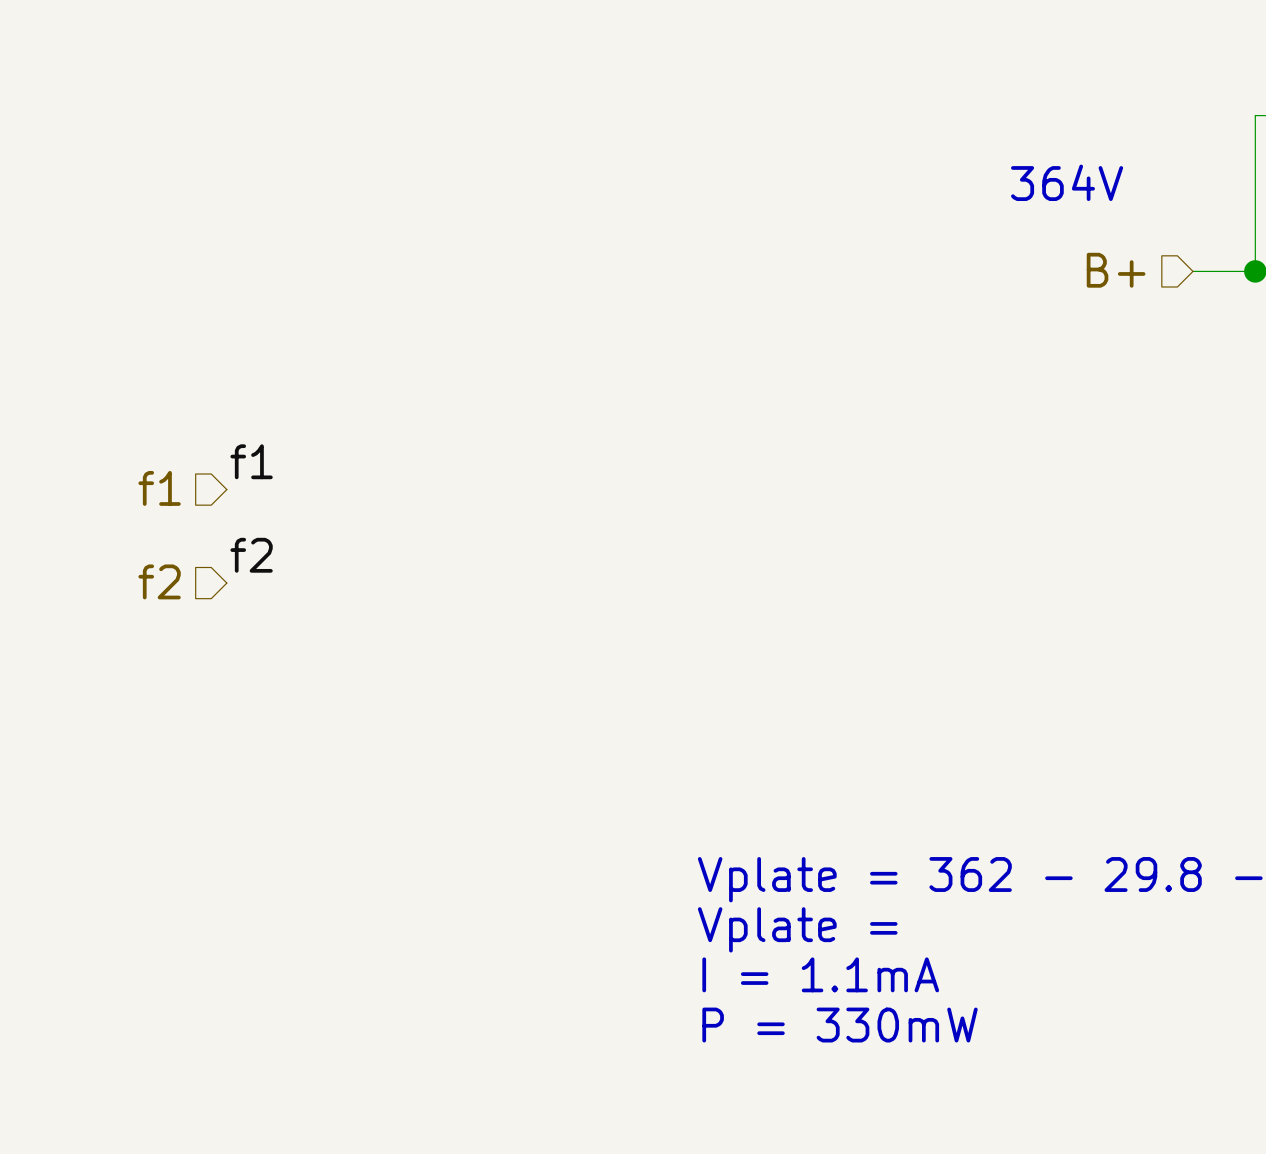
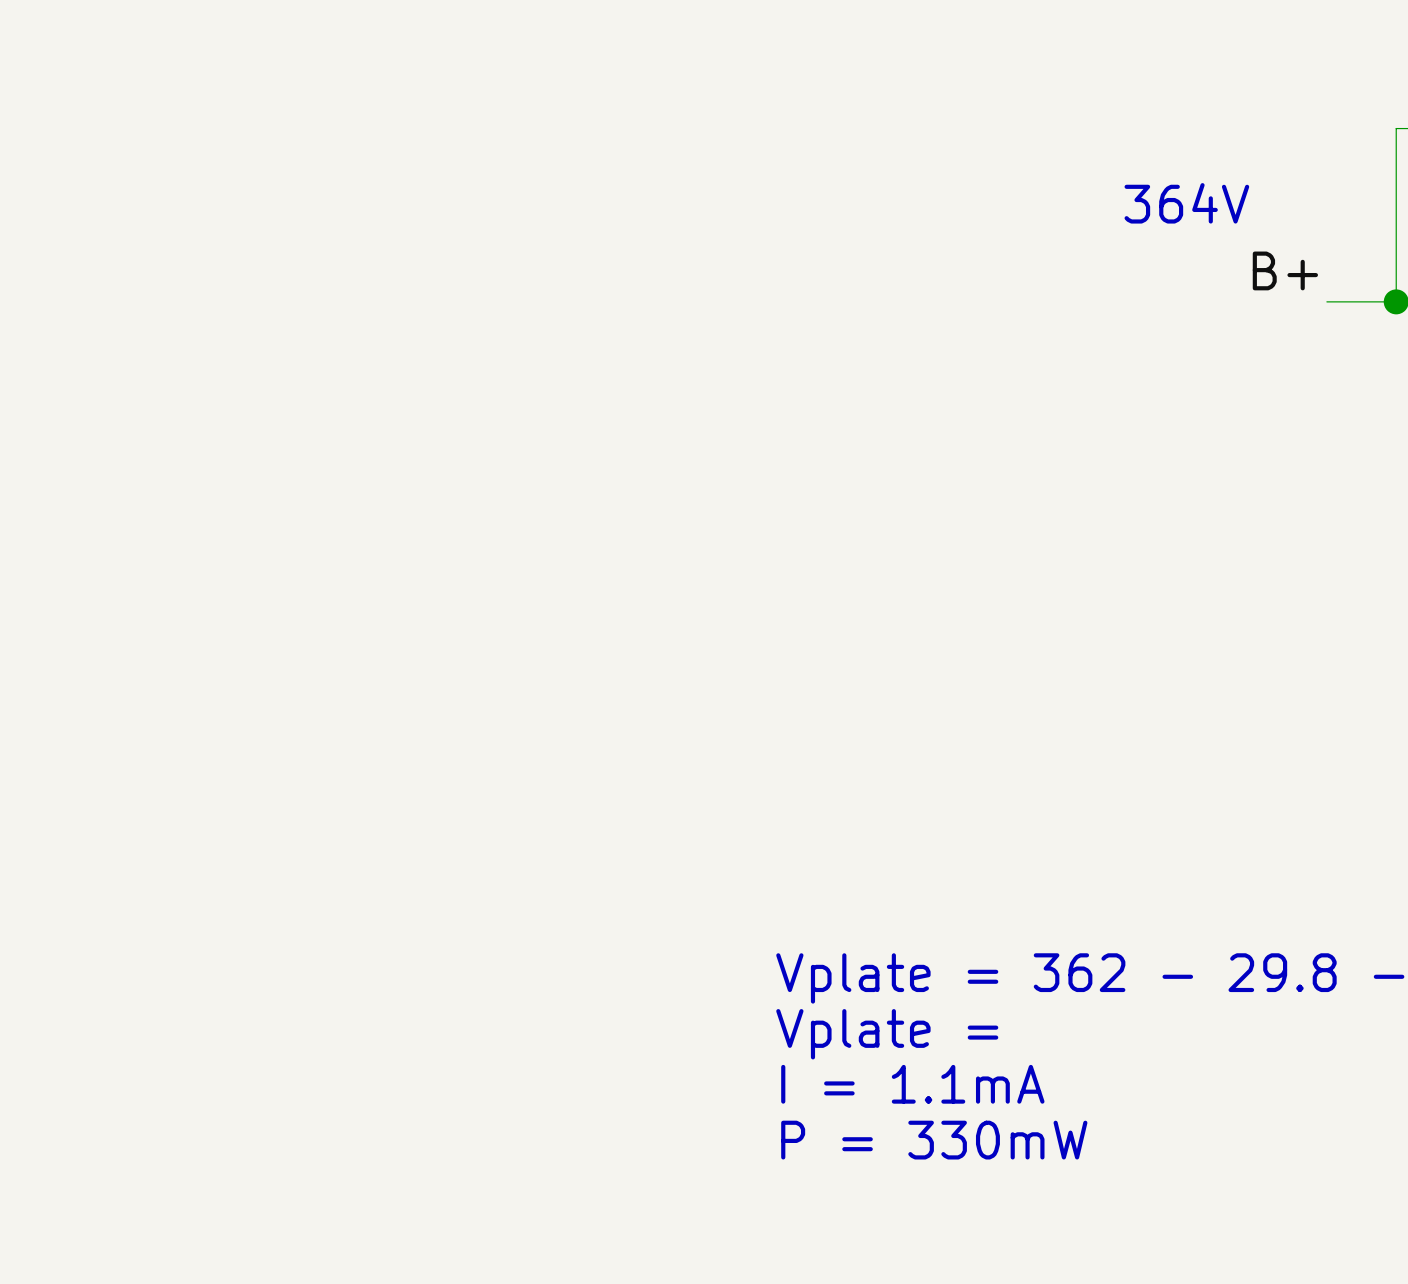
label: none -> B+ (1285, 270)
hierarchical label: B+ (1116, 270) -> none
label: f1 (251, 461) -> none
hierarchical label: f1 (159, 488) -> none
label: f2 (251, 555) -> none
hierarchical label: f2 (159, 581) -> none

